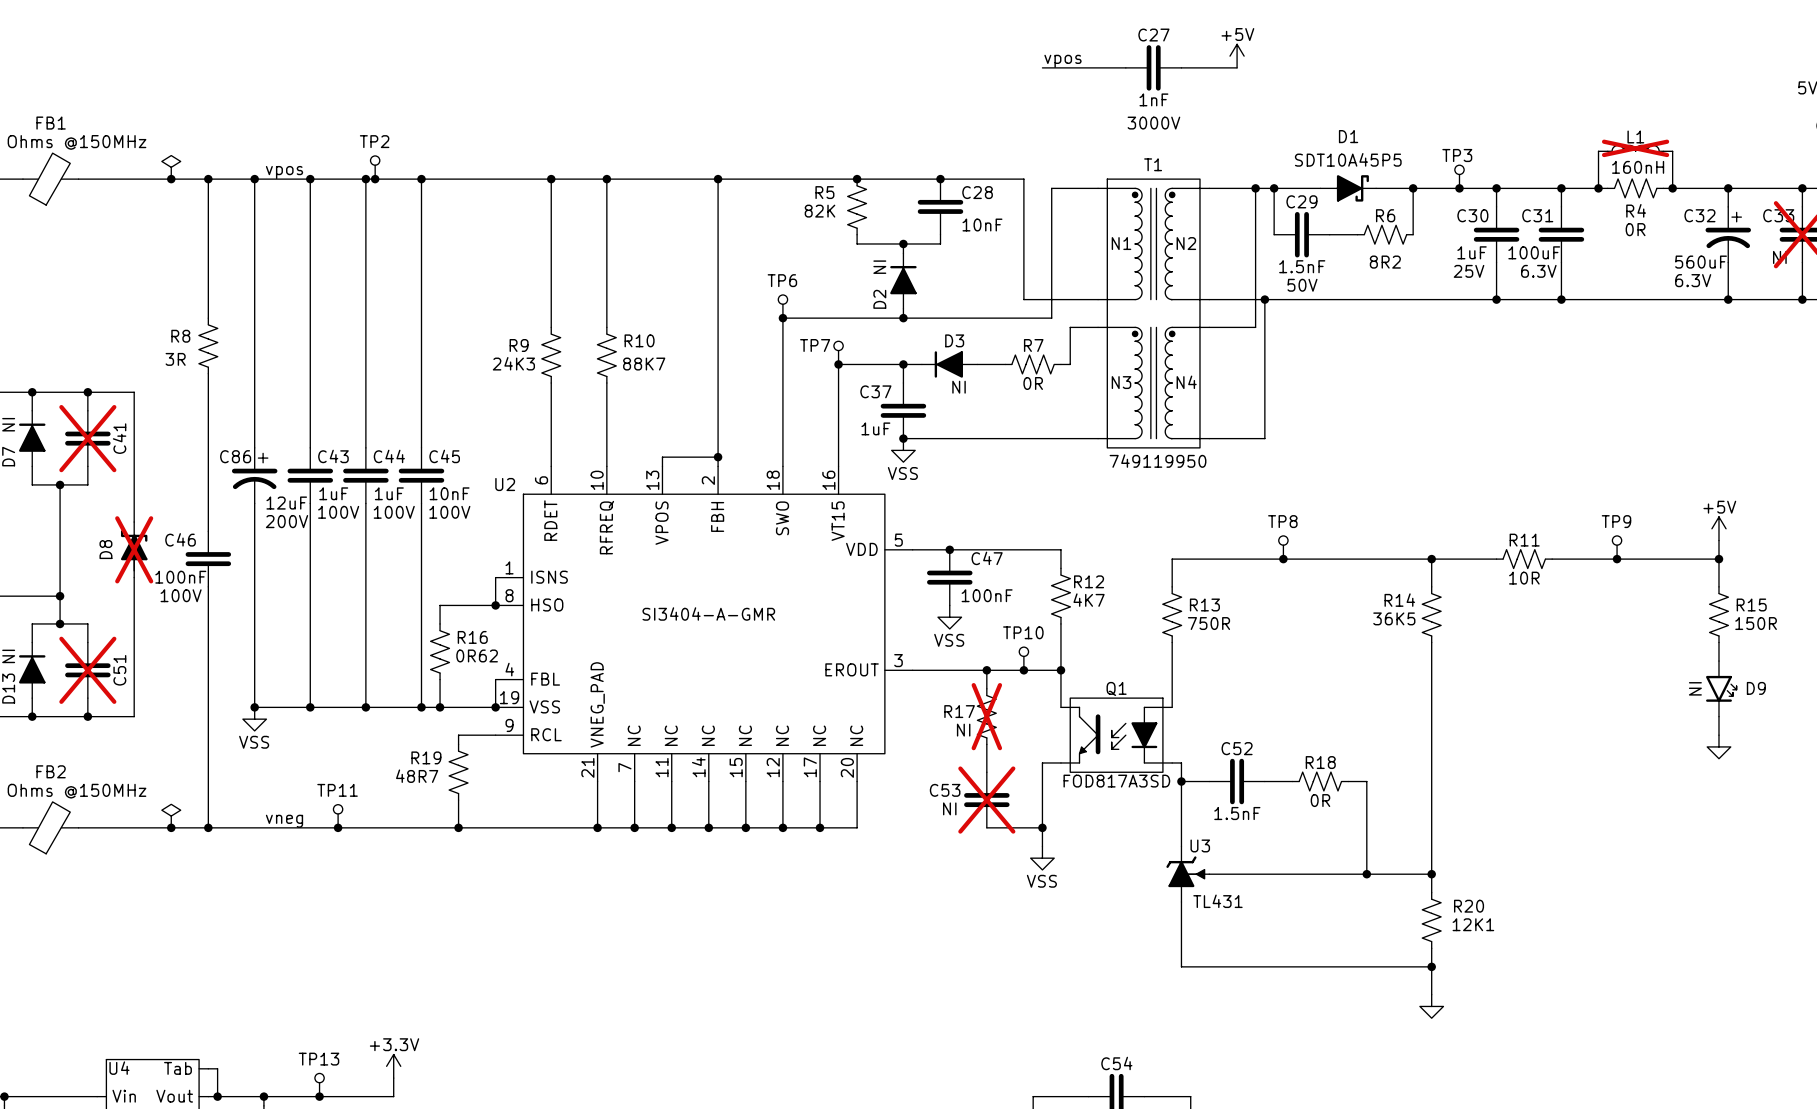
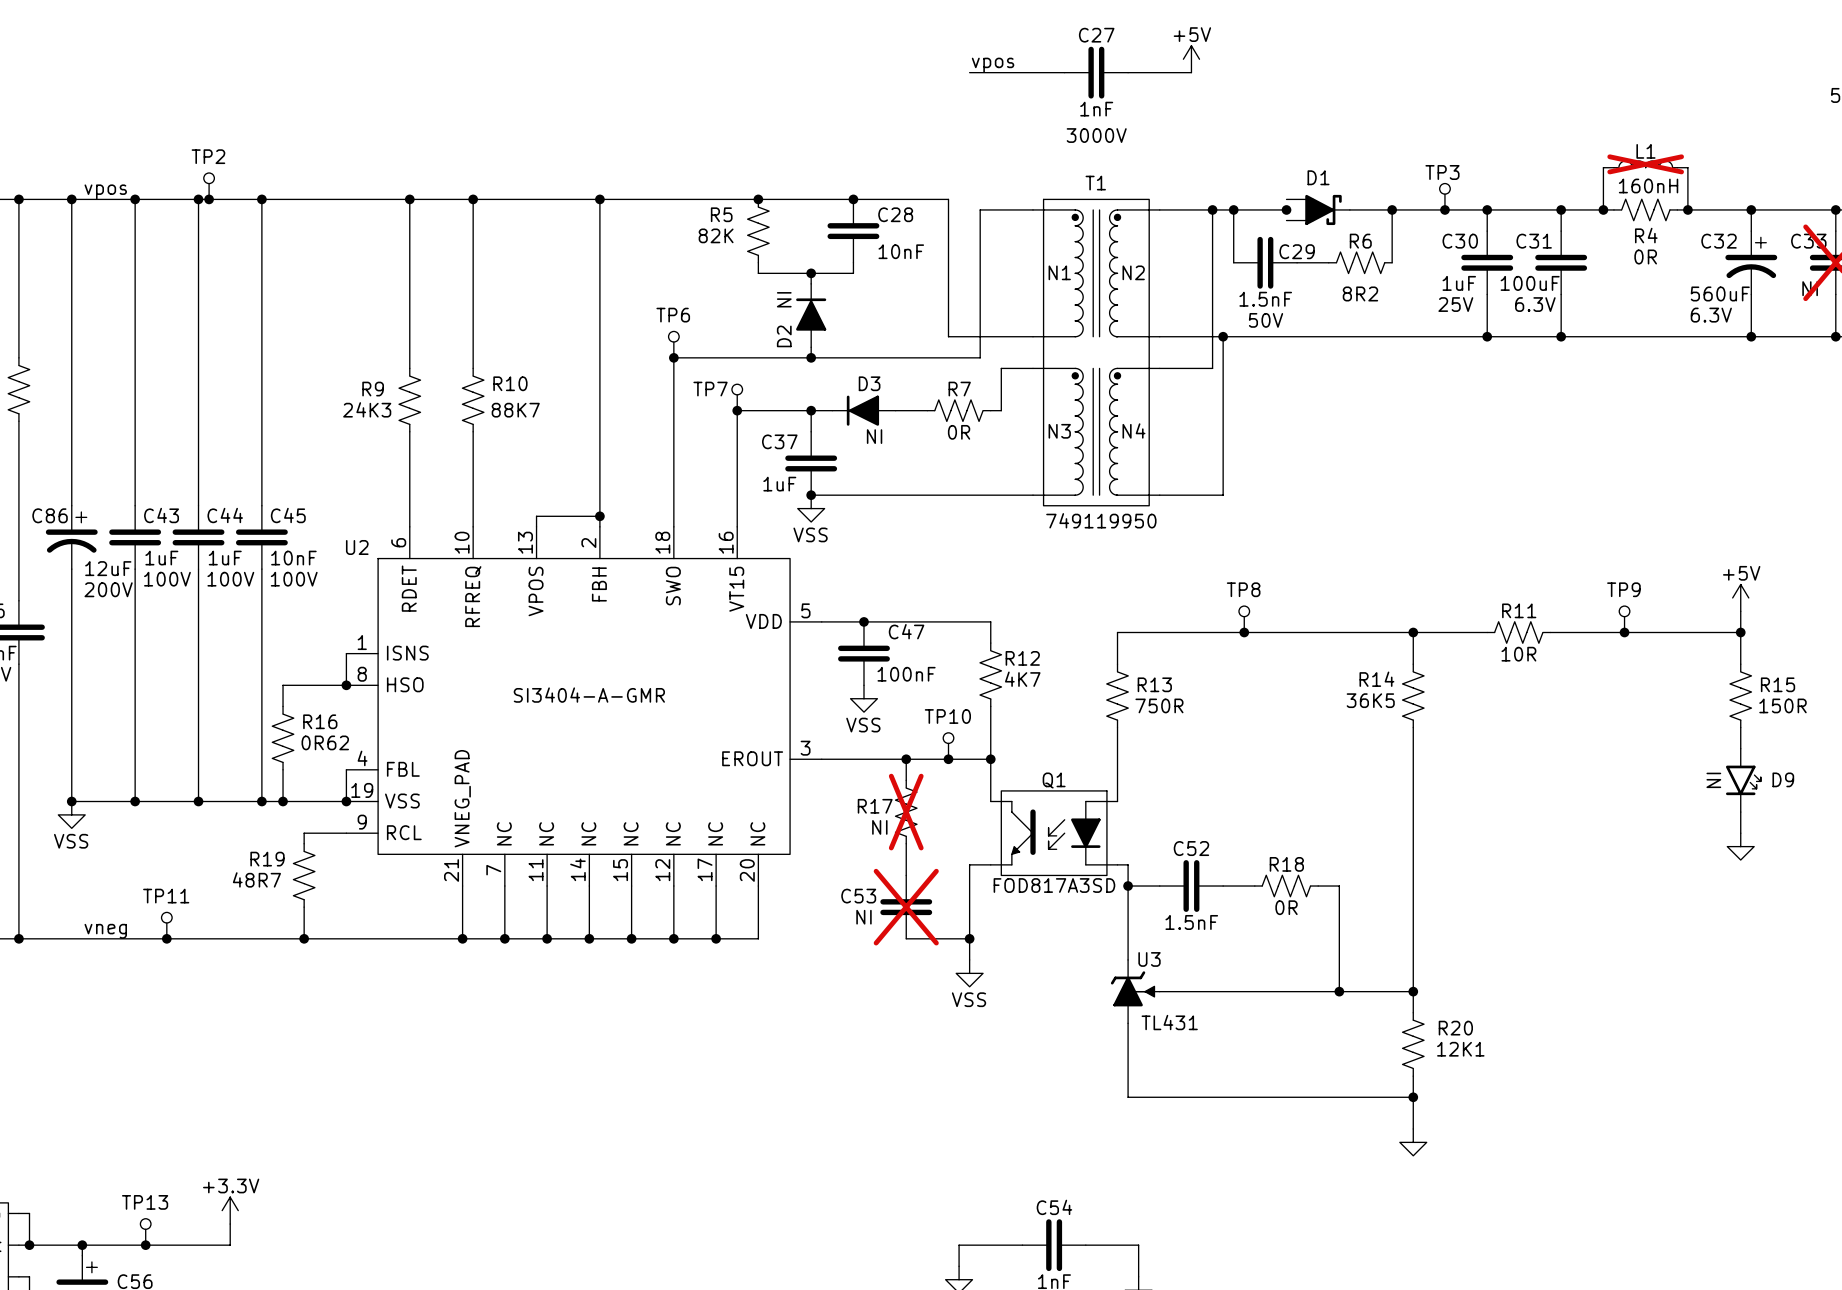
D1 name position: D1 (1348, 136) -> D1 (1318, 177)
D1 value: SDT10A45P5 (1348, 159) -> none
D1 symbol: [1320, 175, 1377, 202] -> [1286, 194, 1350, 226]
junction: none -> (1286, 209)
C29 name position: C29 (1301, 201) -> C29 (1297, 251)

